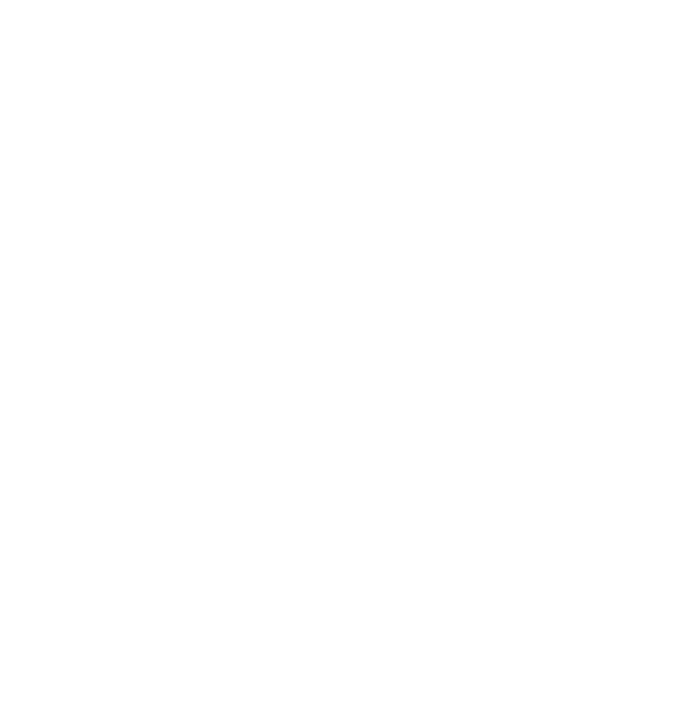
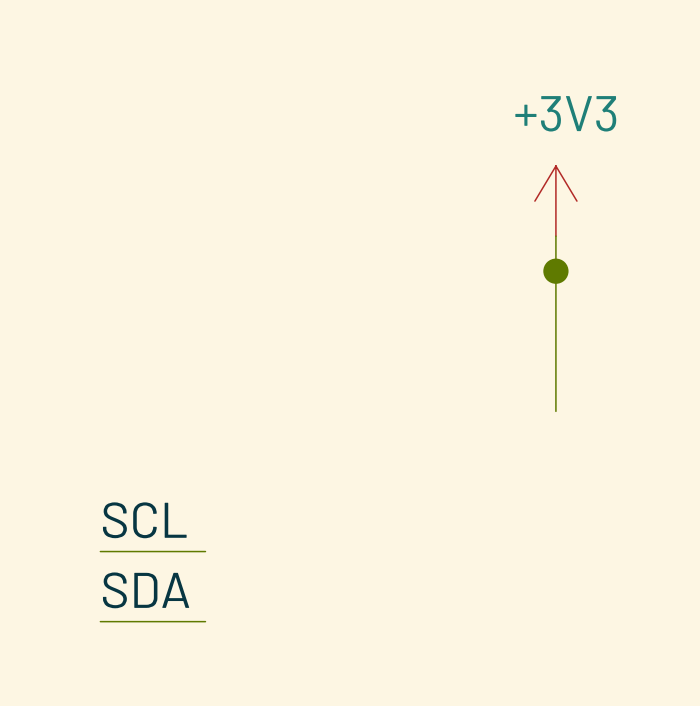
power symbol: none -> +3V3 (555, 201)
wire: none -> (555, 236) (555, 411)
junction: none -> (555, 271)
label: none -> SCL (144, 520)
wire: none -> (100, 551) (205, 551)
label: none -> SDA (146, 590)
wire: none -> (100, 621) (205, 621)

